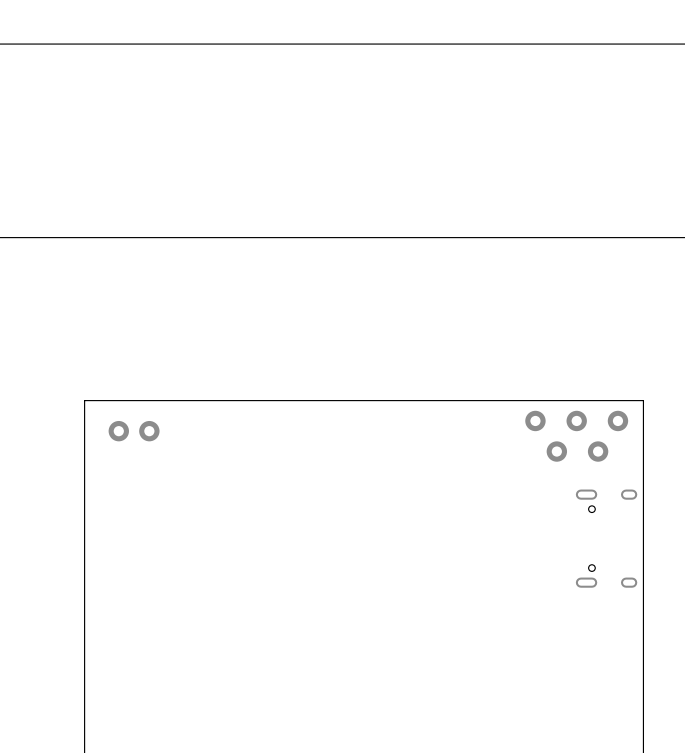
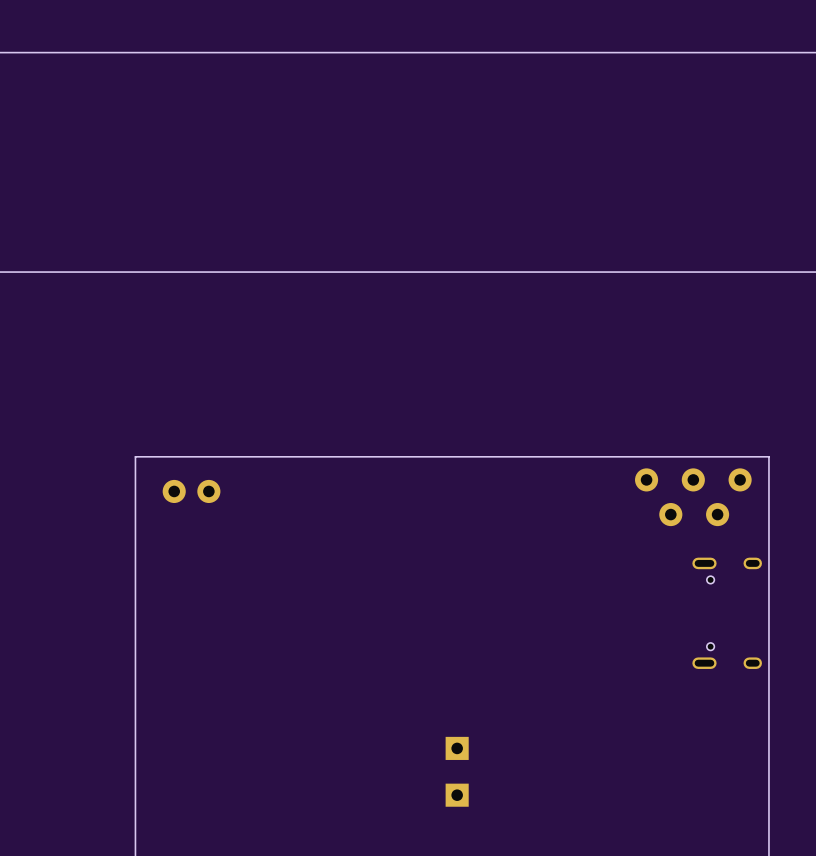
part: none -> (457, 748)
part: none -> (457, 795)

